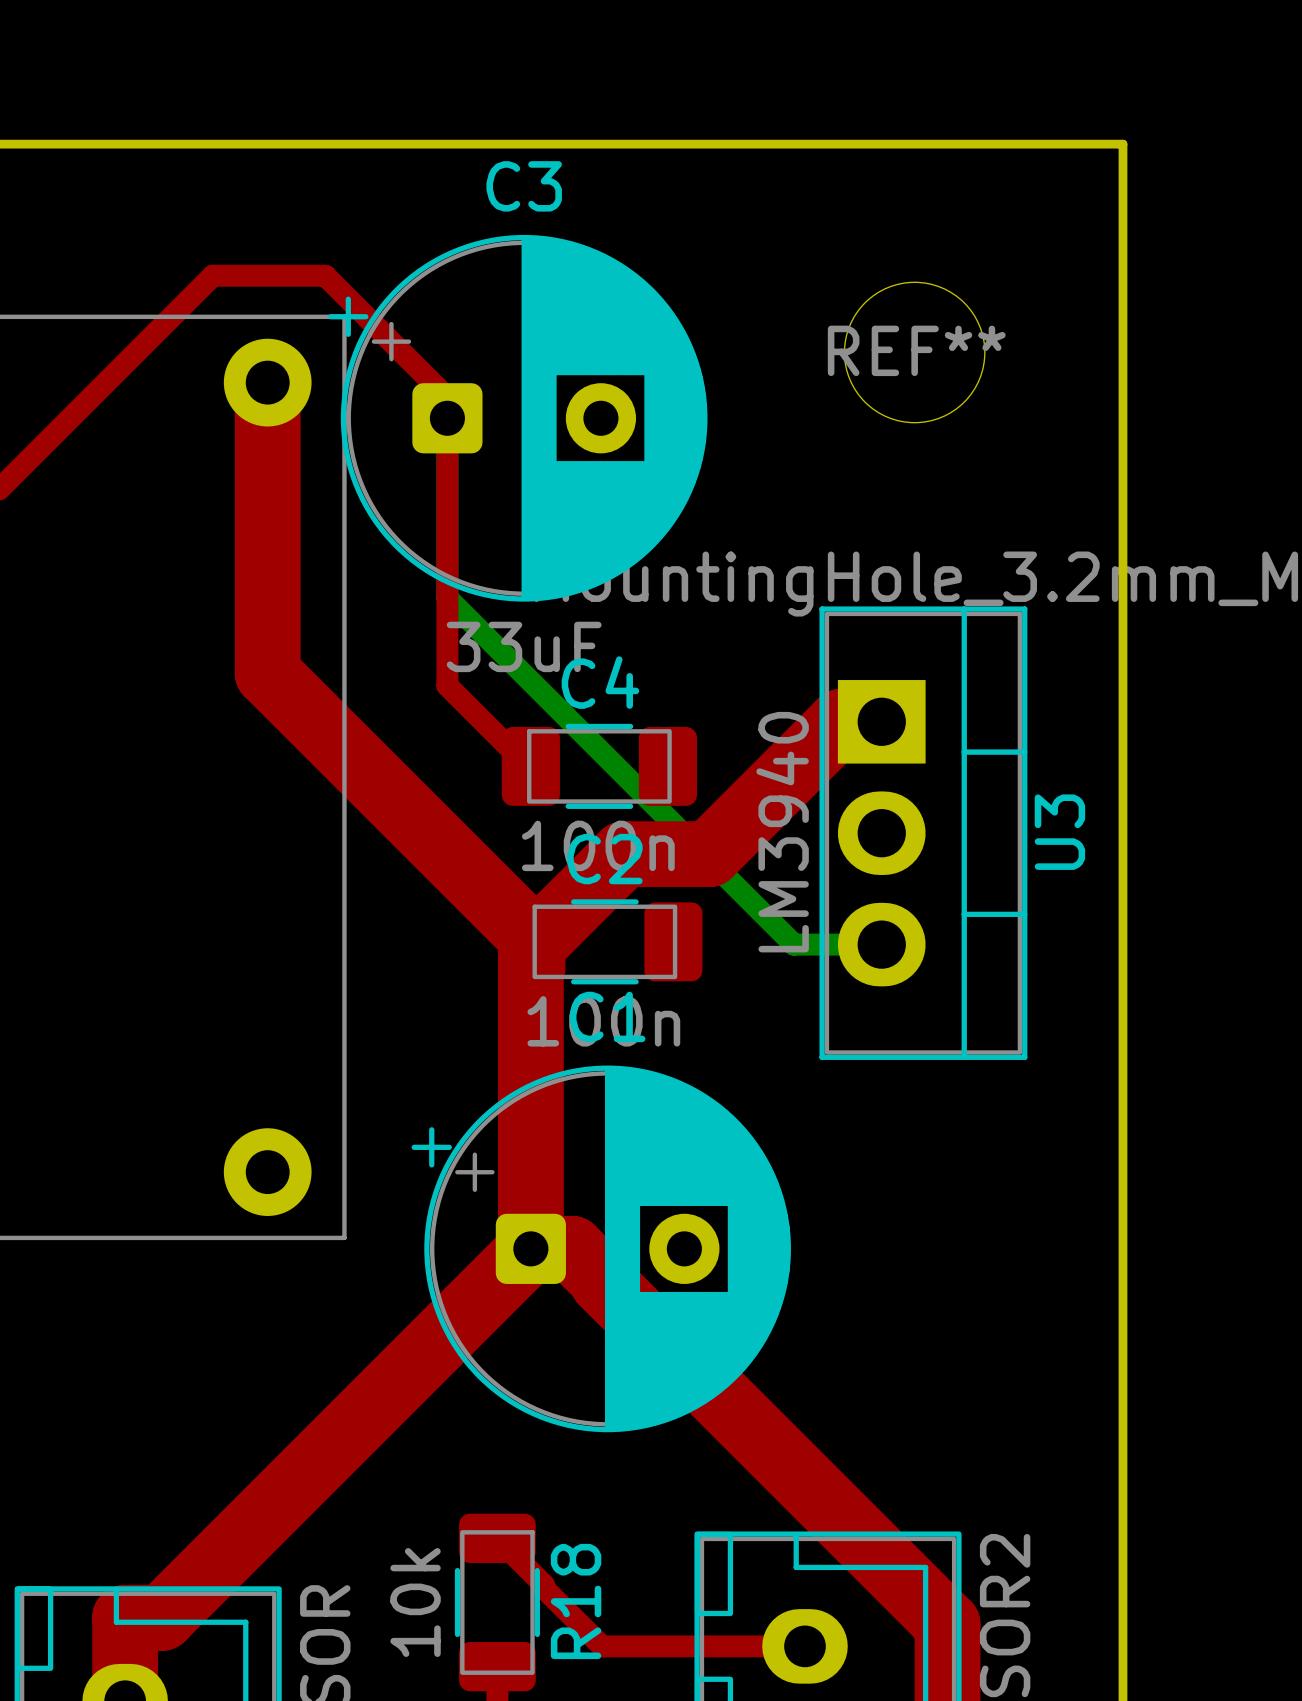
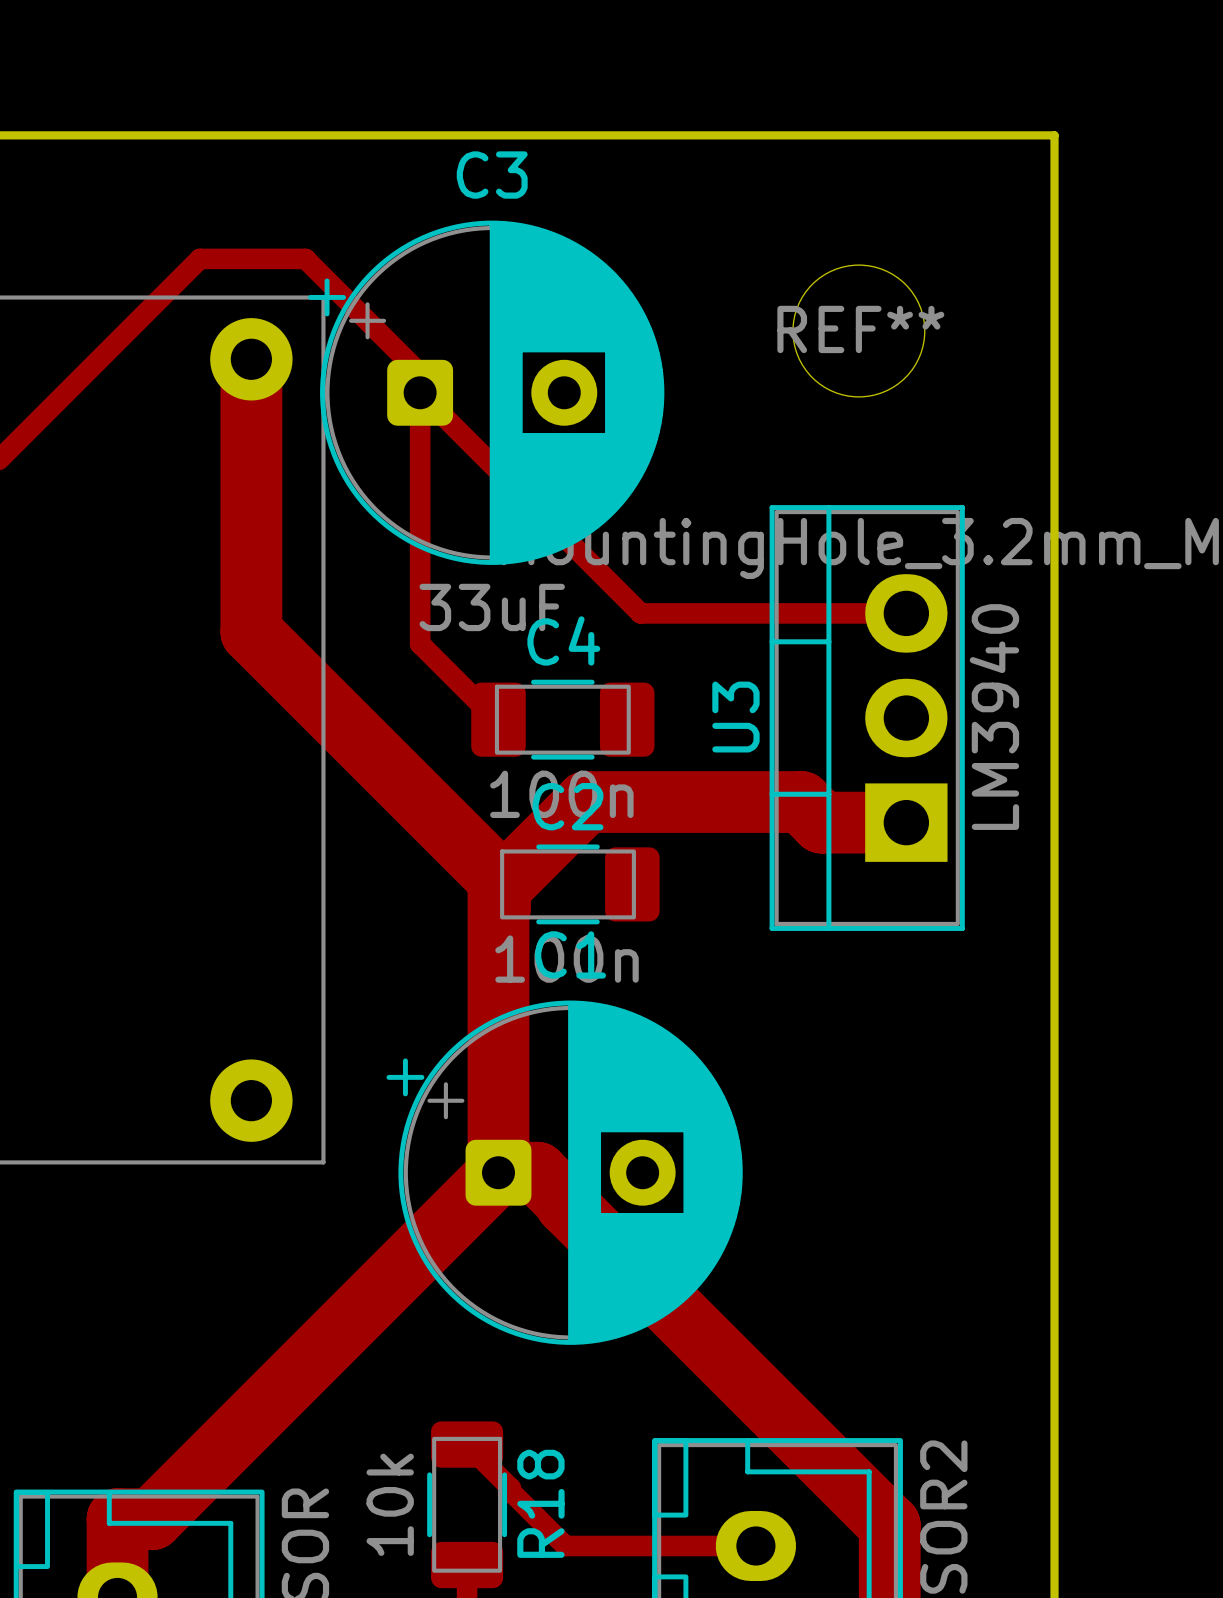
top track: none -> (420, 392) (640, 613) (906, 613)
bottom track: (447, 418) (447, 597) (794, 944) (881, 944) -> none
top track: (881, 721) (841, 721) (709, 854) -> (906, 822) (821, 822) (801, 802) (665, 802)
U3 rotation: 0° (923, 833) -> 180° (867, 718)

